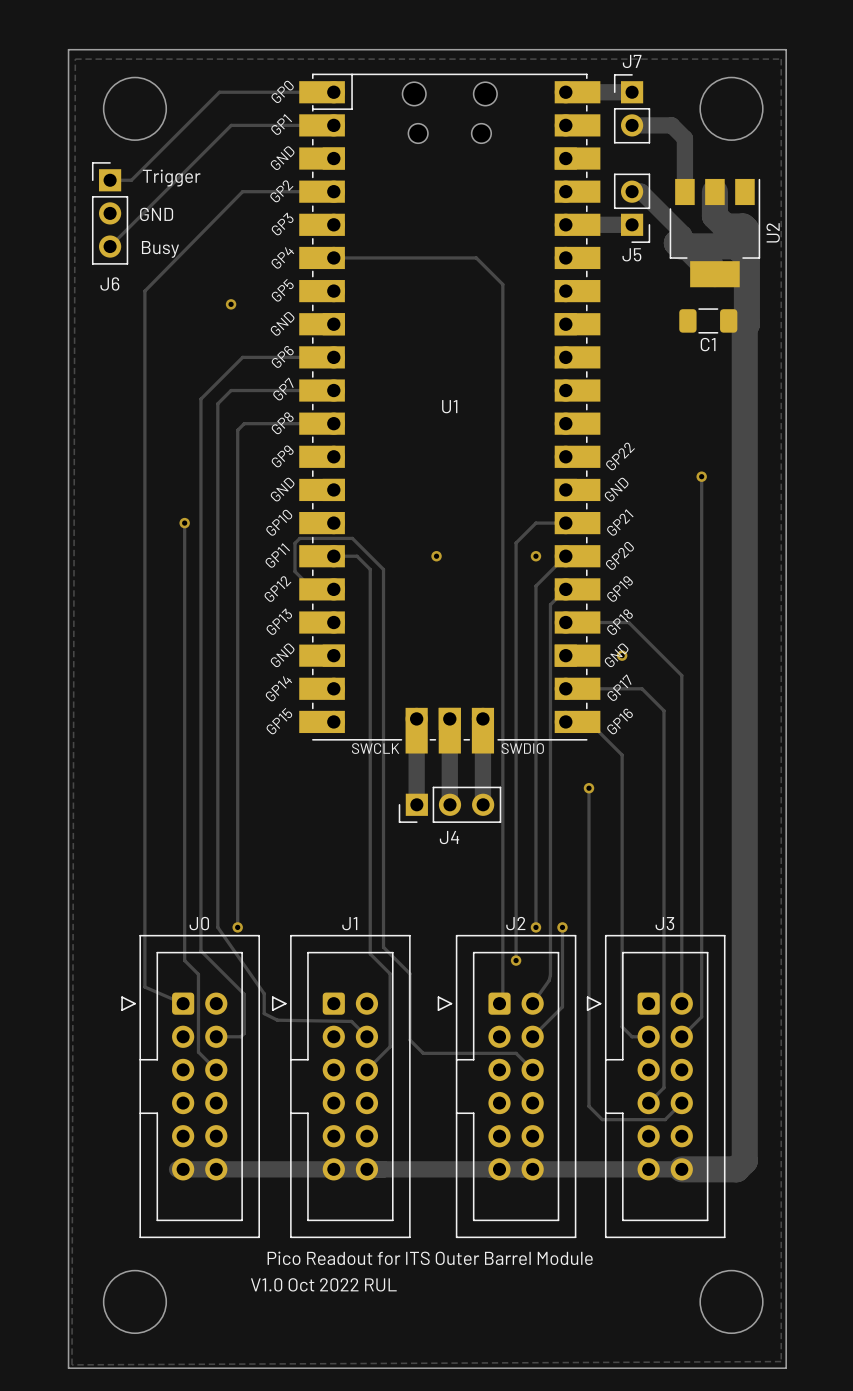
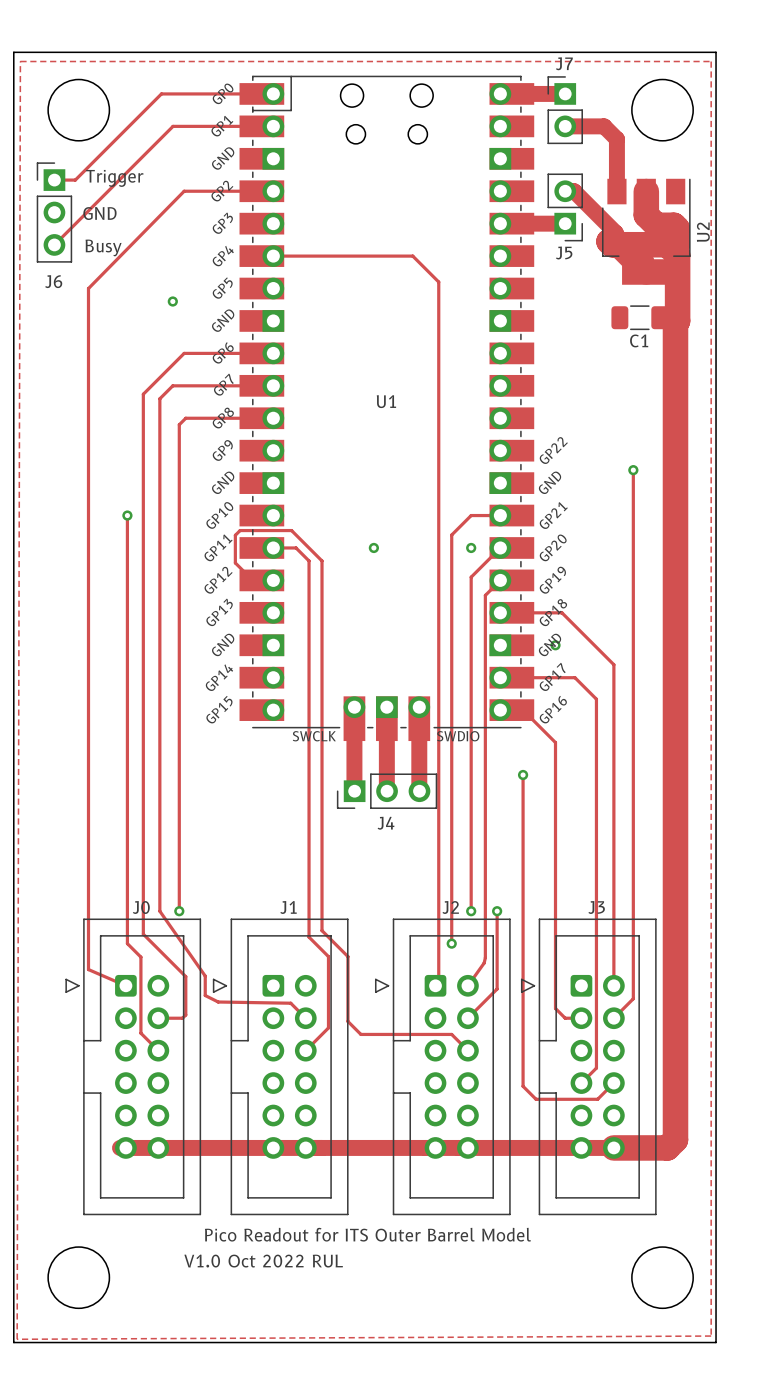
text: Pico Readout for ITS Outer Barrel Module (430, 1258) -> Pico Readout for ITS Outer Barrel Model (367, 1234)

